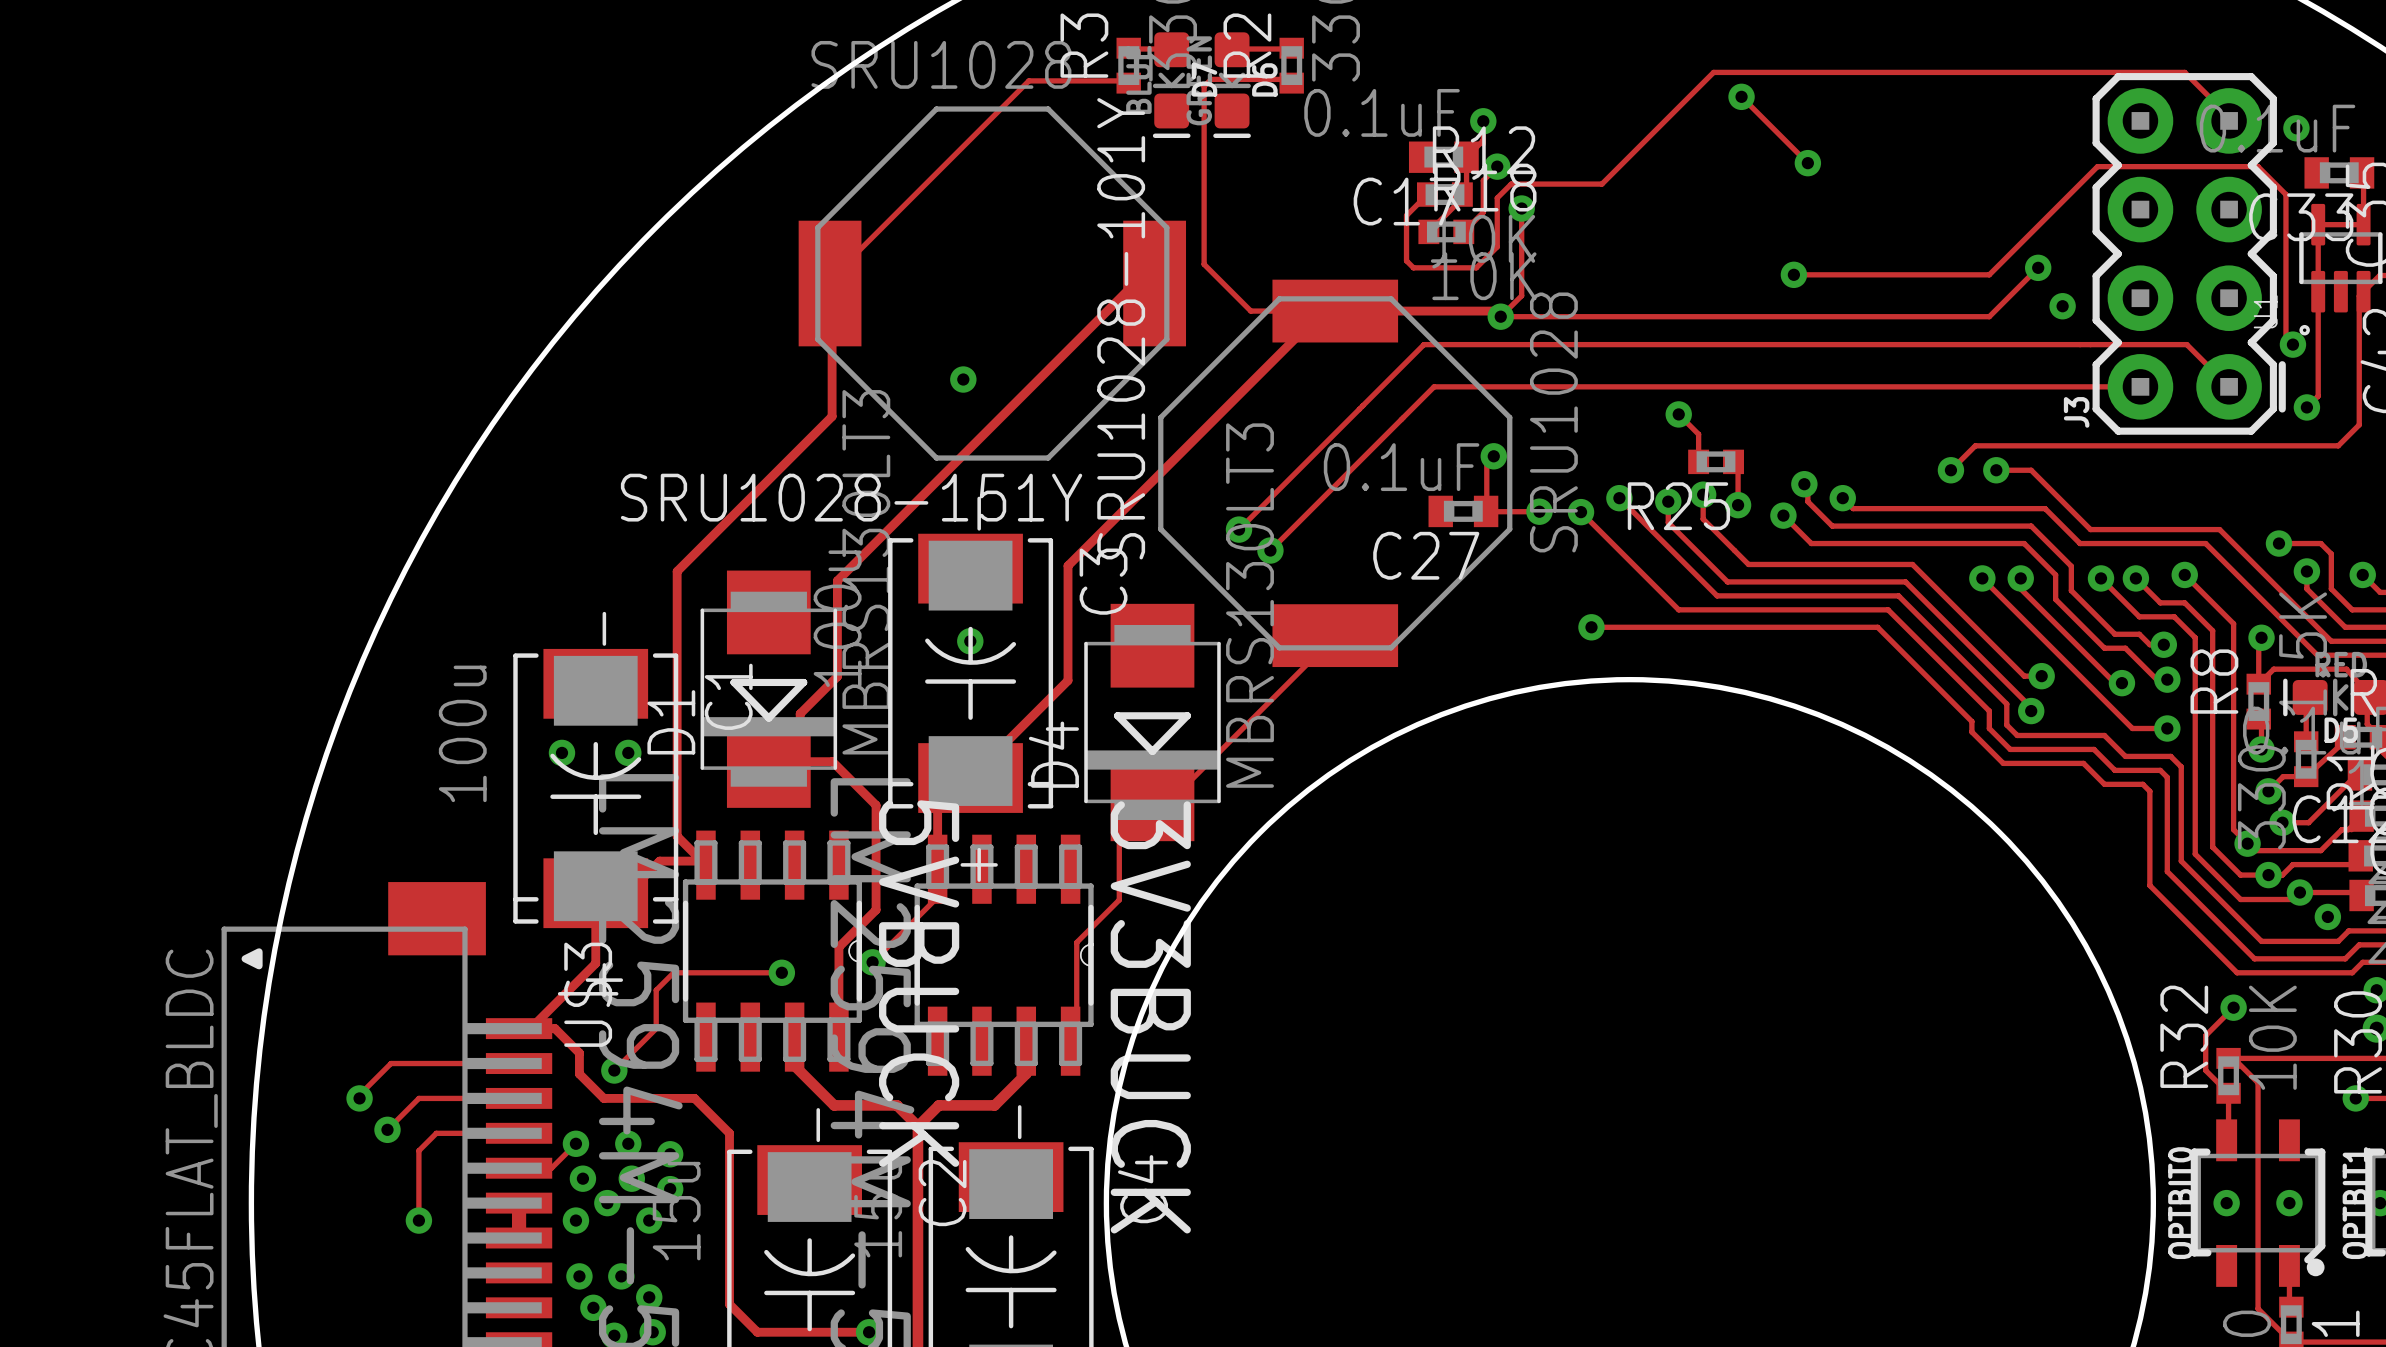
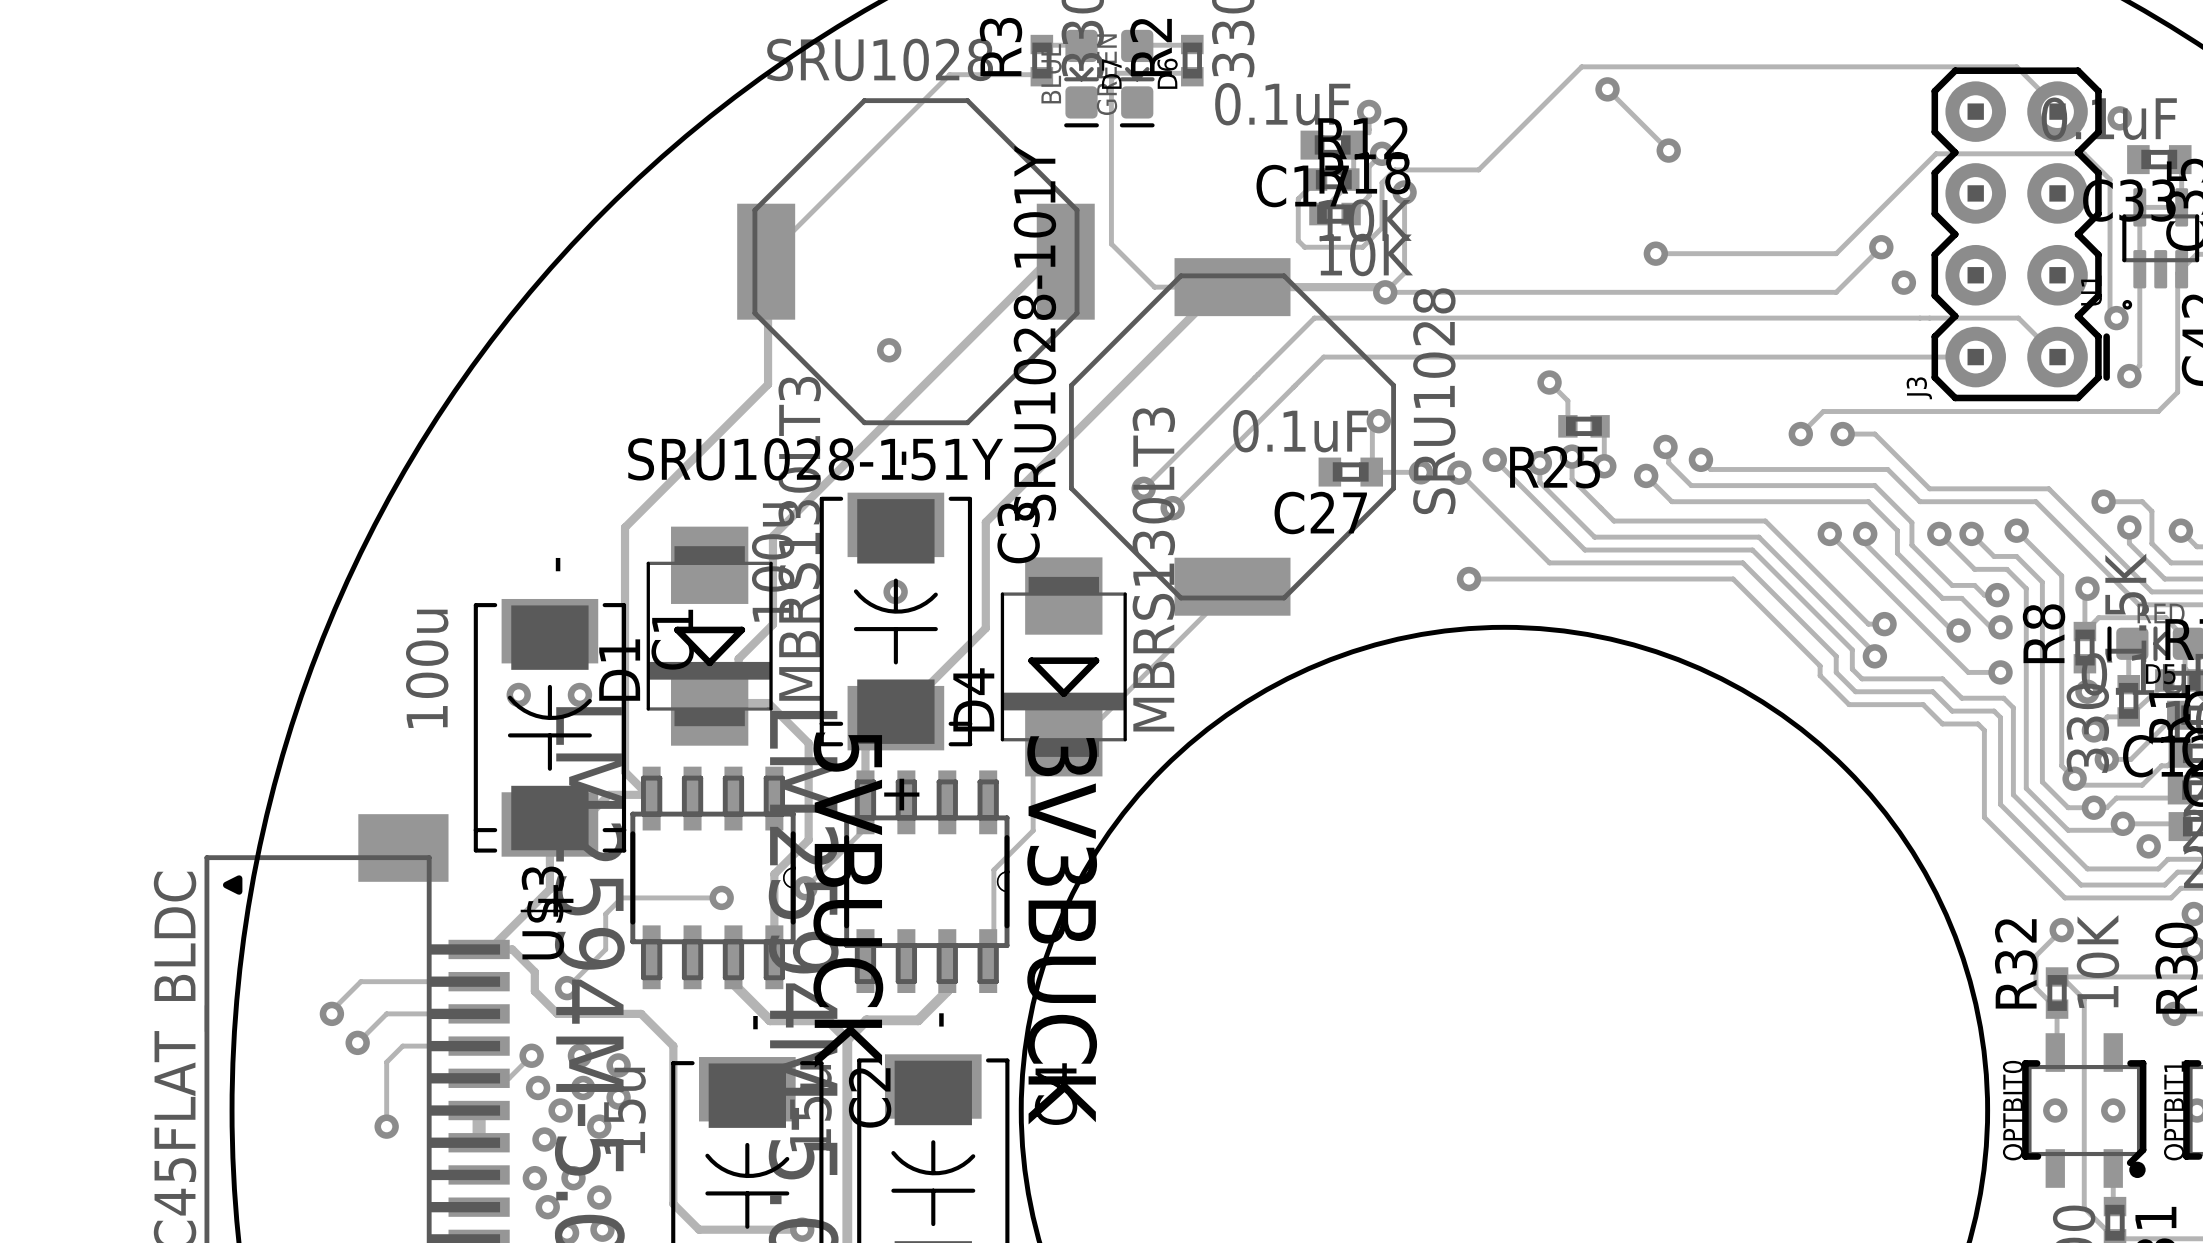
via position: (575, 1220) -> (544, 1139)

